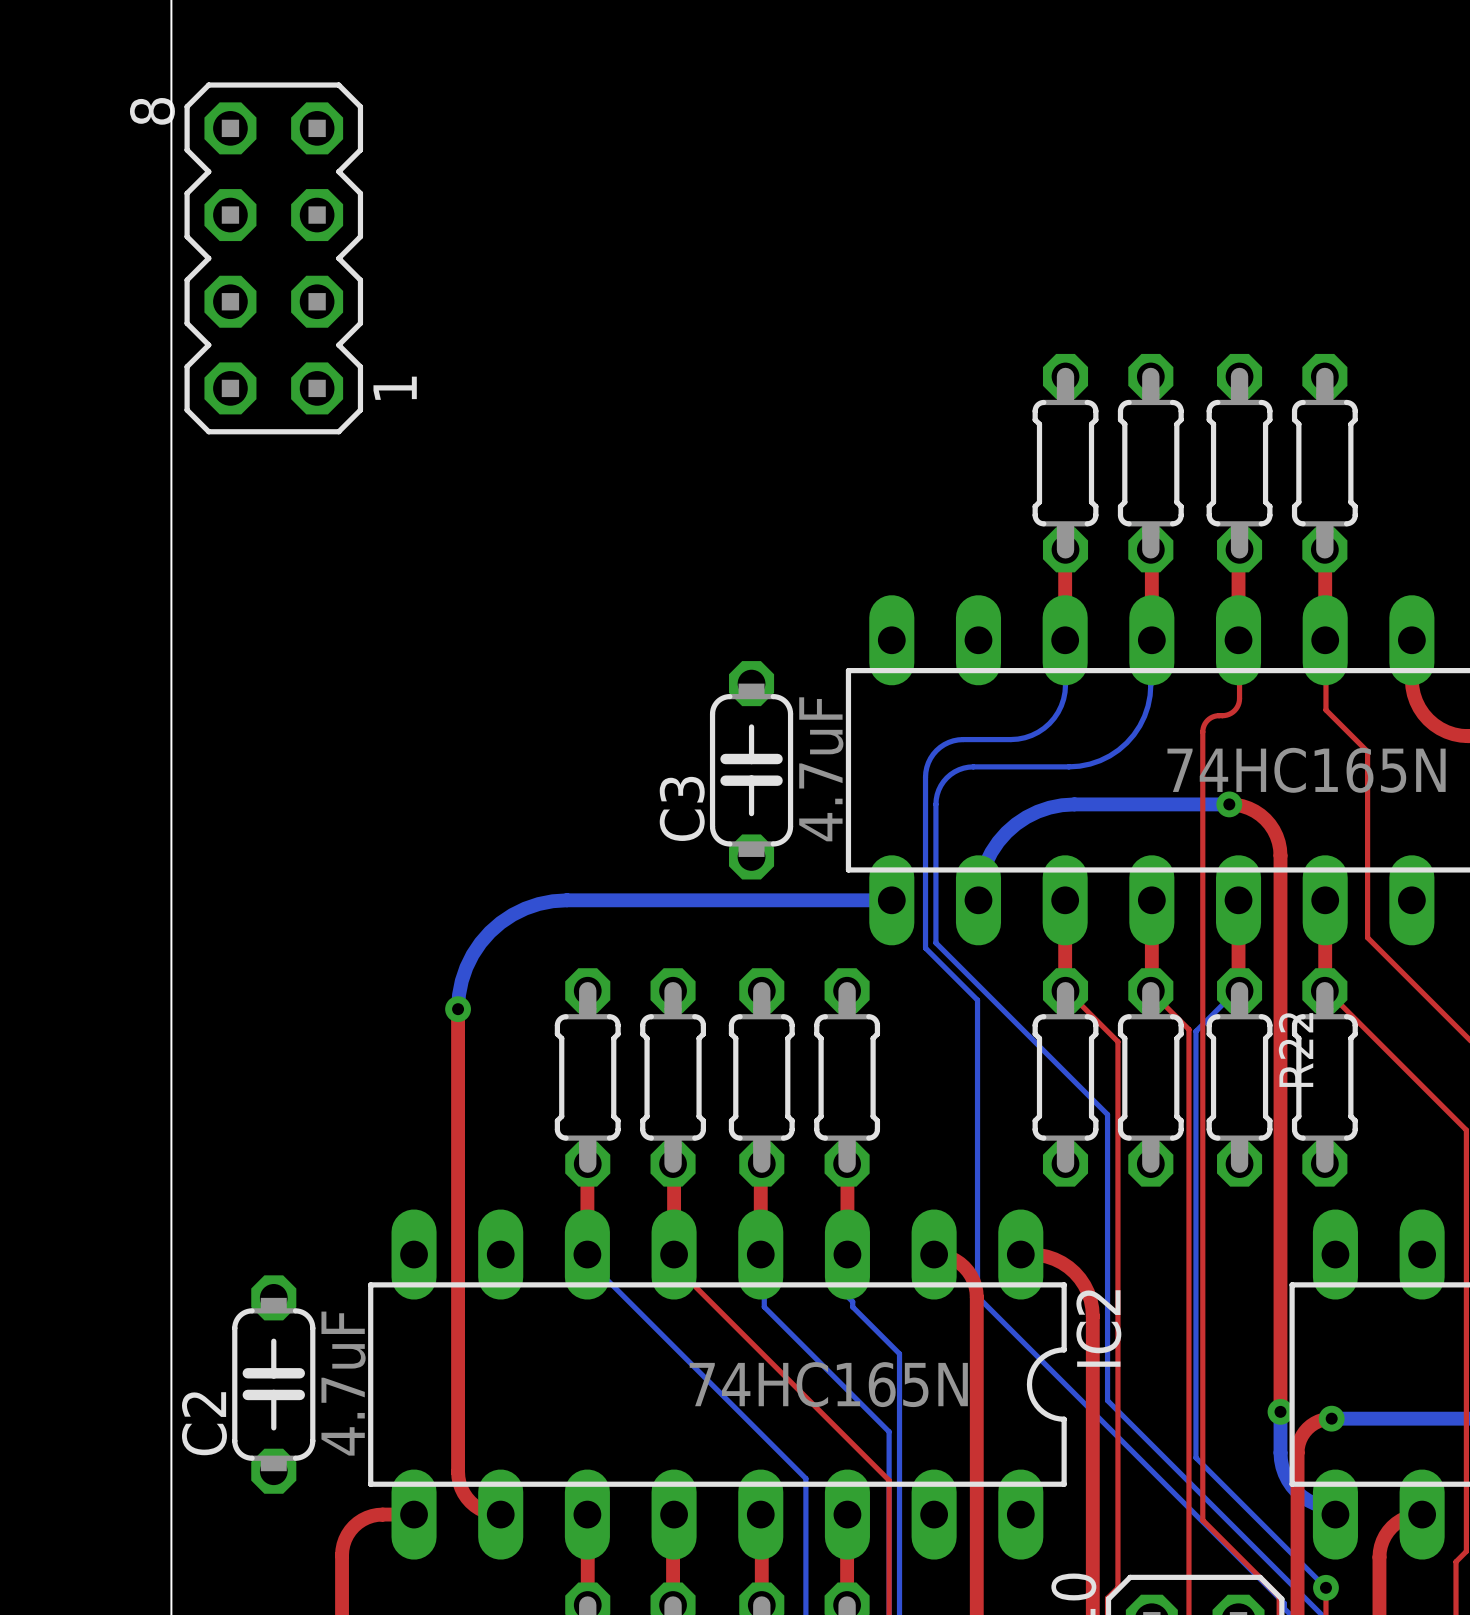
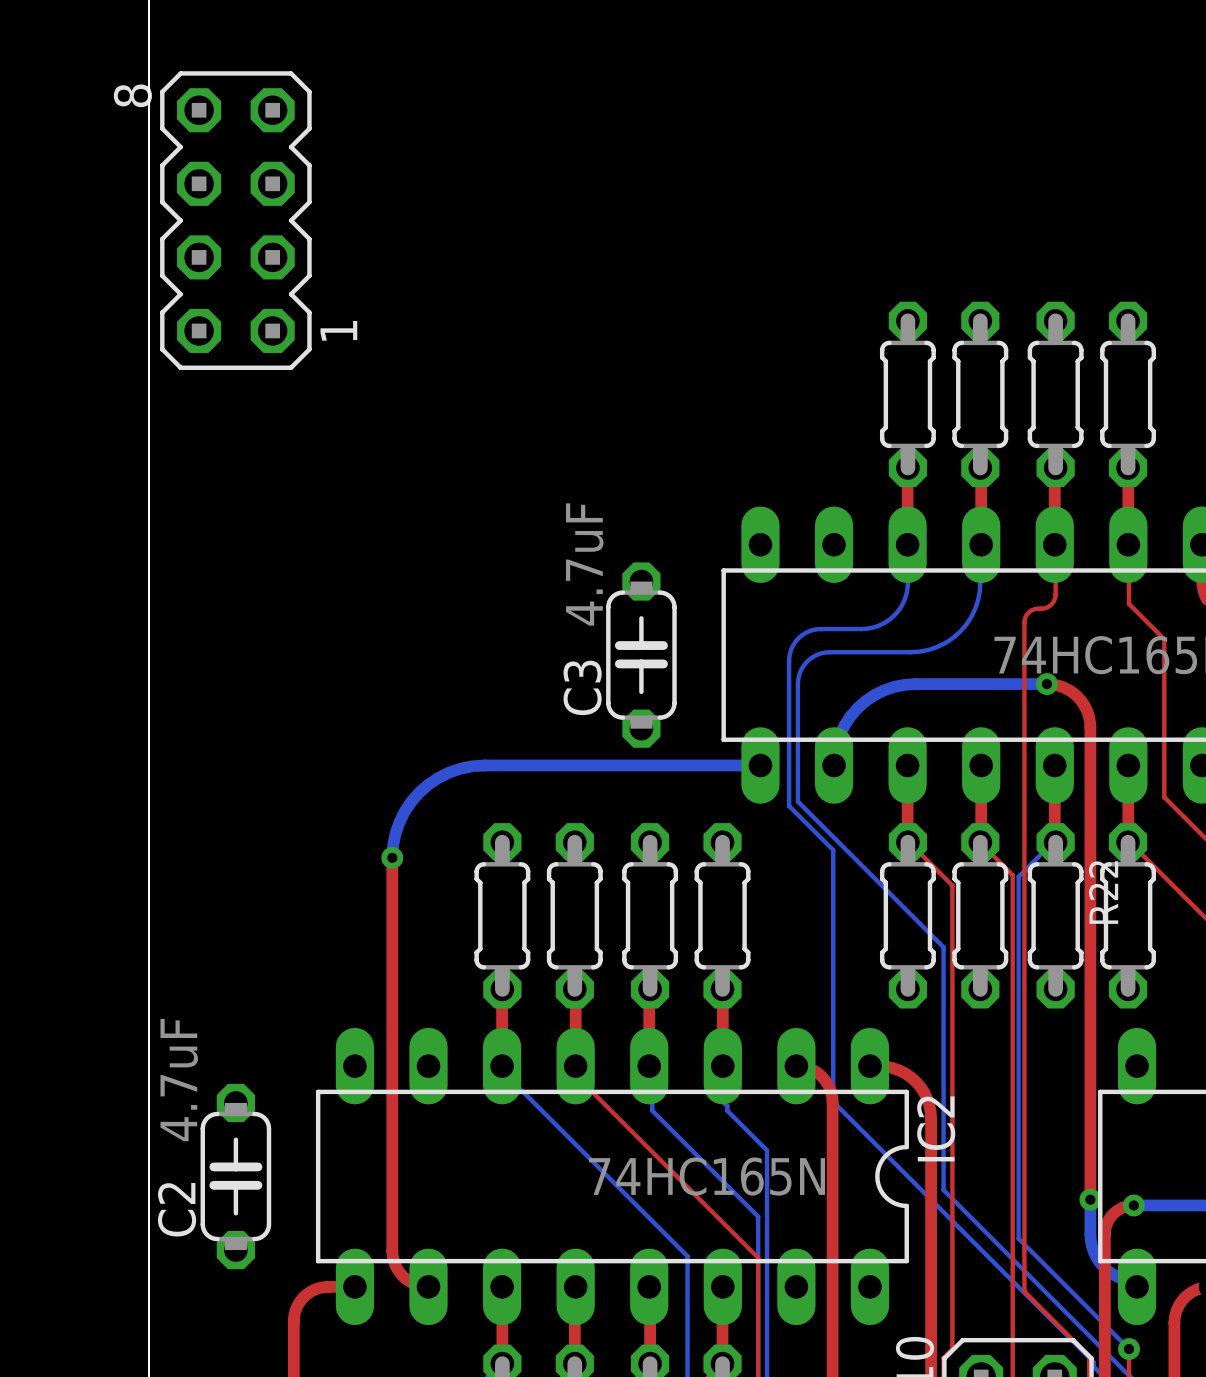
C3 value position: 4.7uF (821, 769) -> 4.7uF (584, 564)
C2 value position: 4.7uF (343, 1383) -> 4.7uF (179, 1080)

